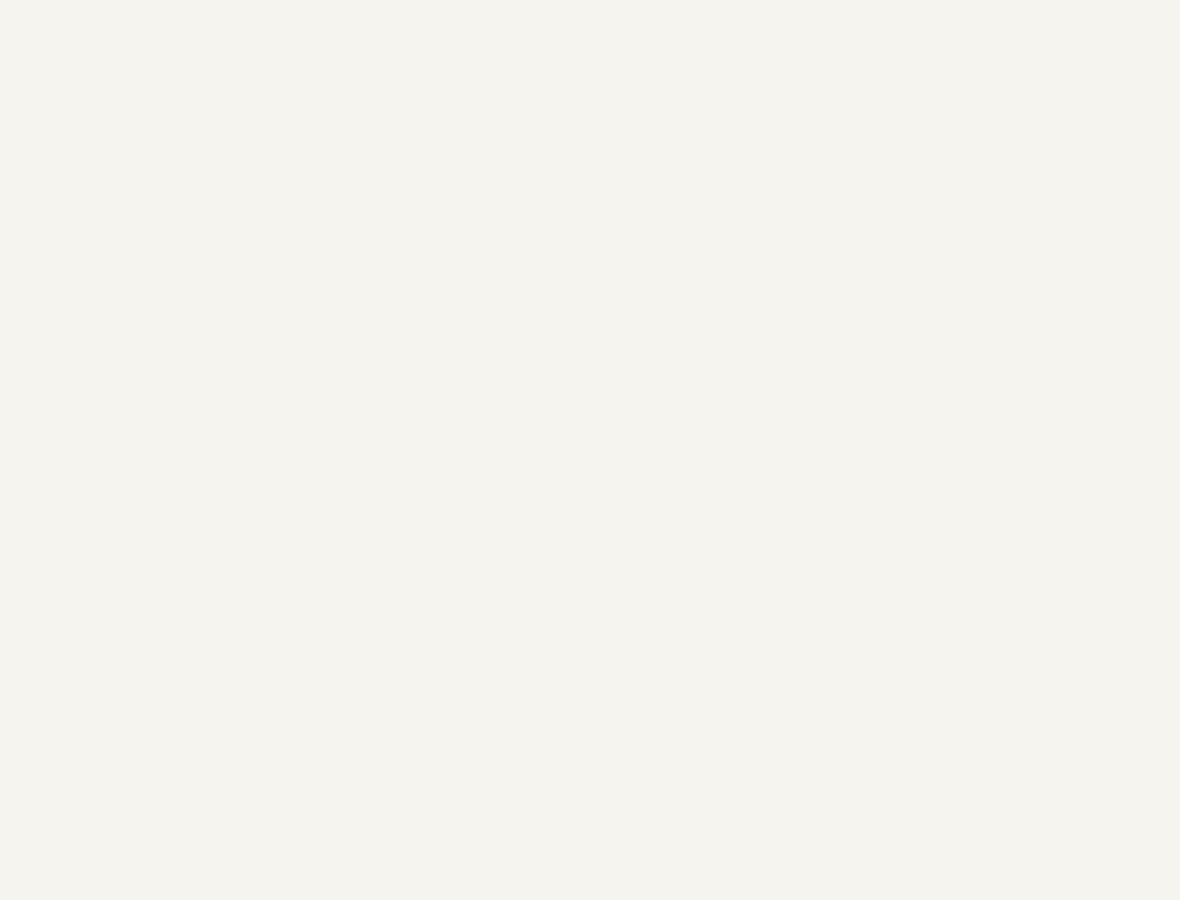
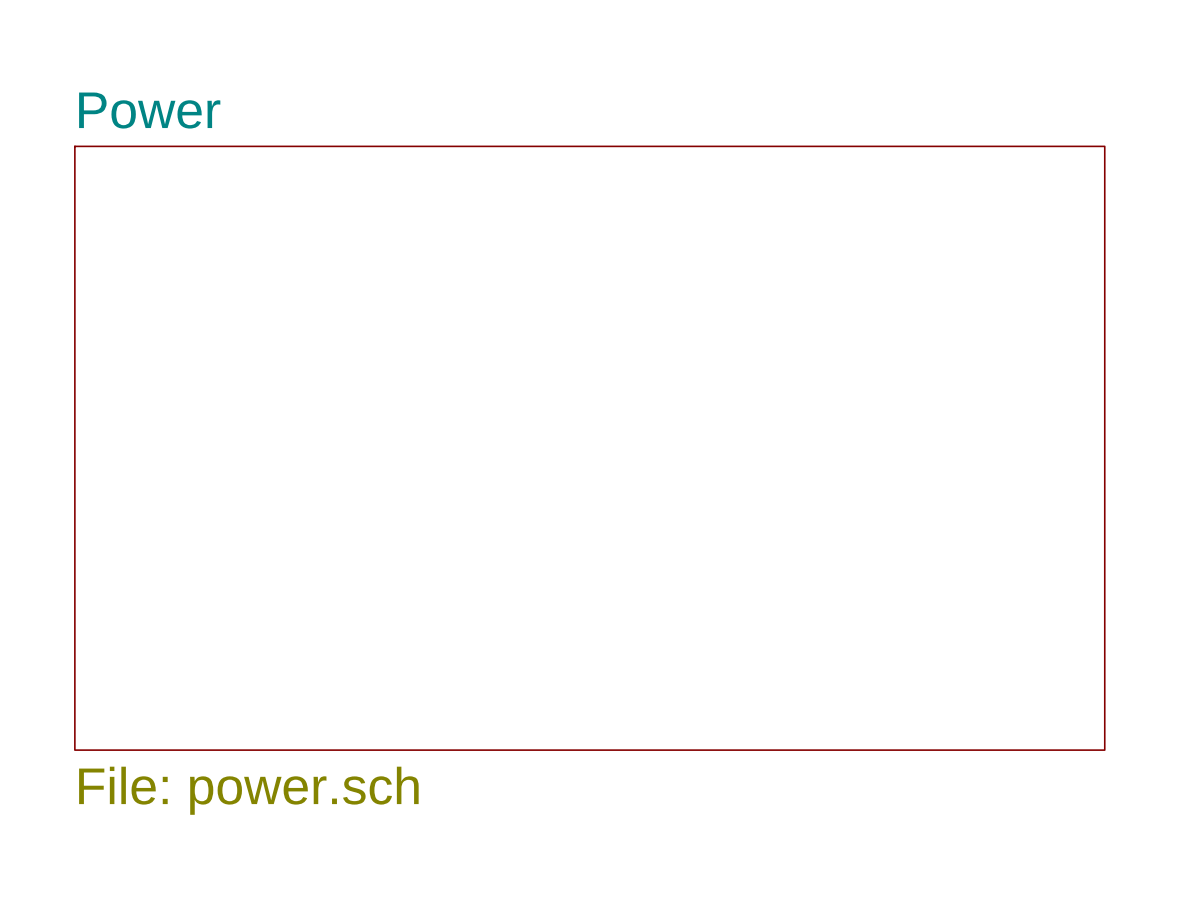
sheet Power: none -> File: power.sch (589, 448)

